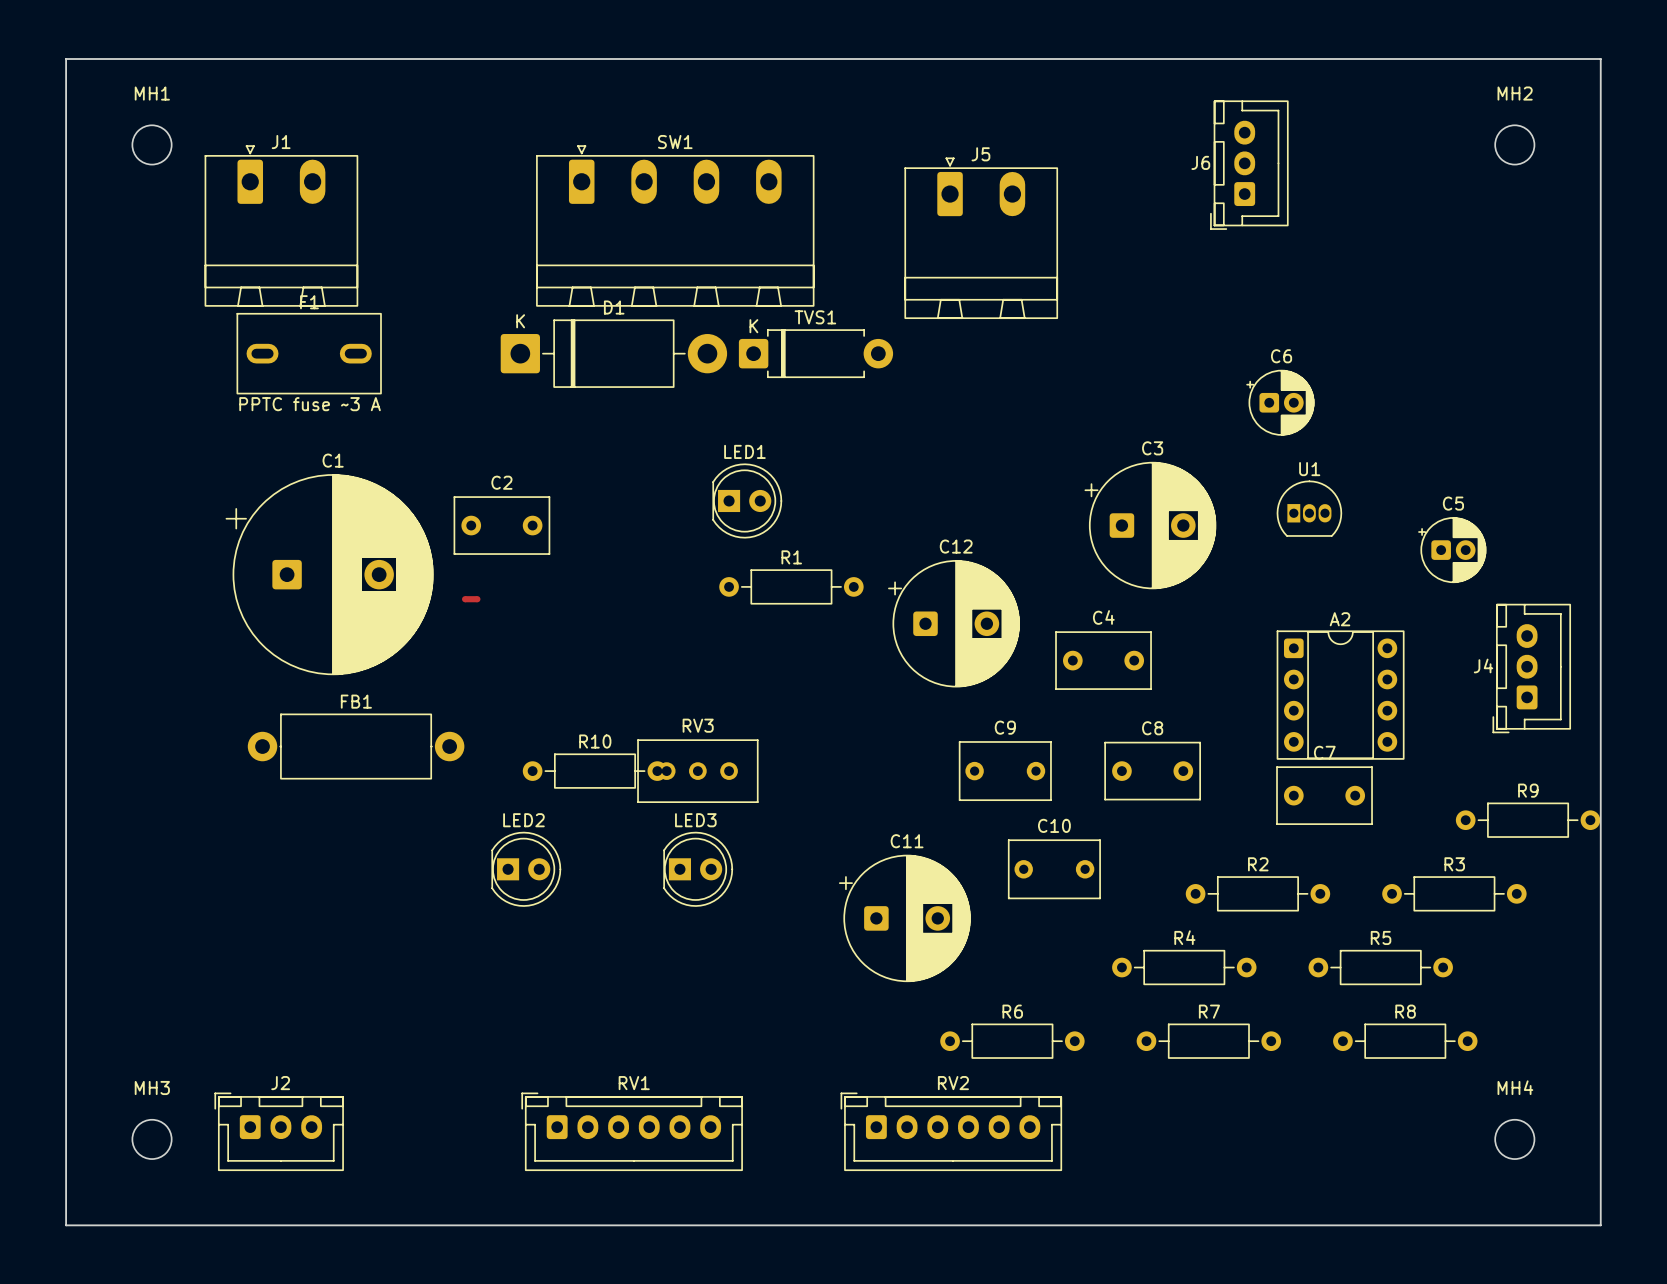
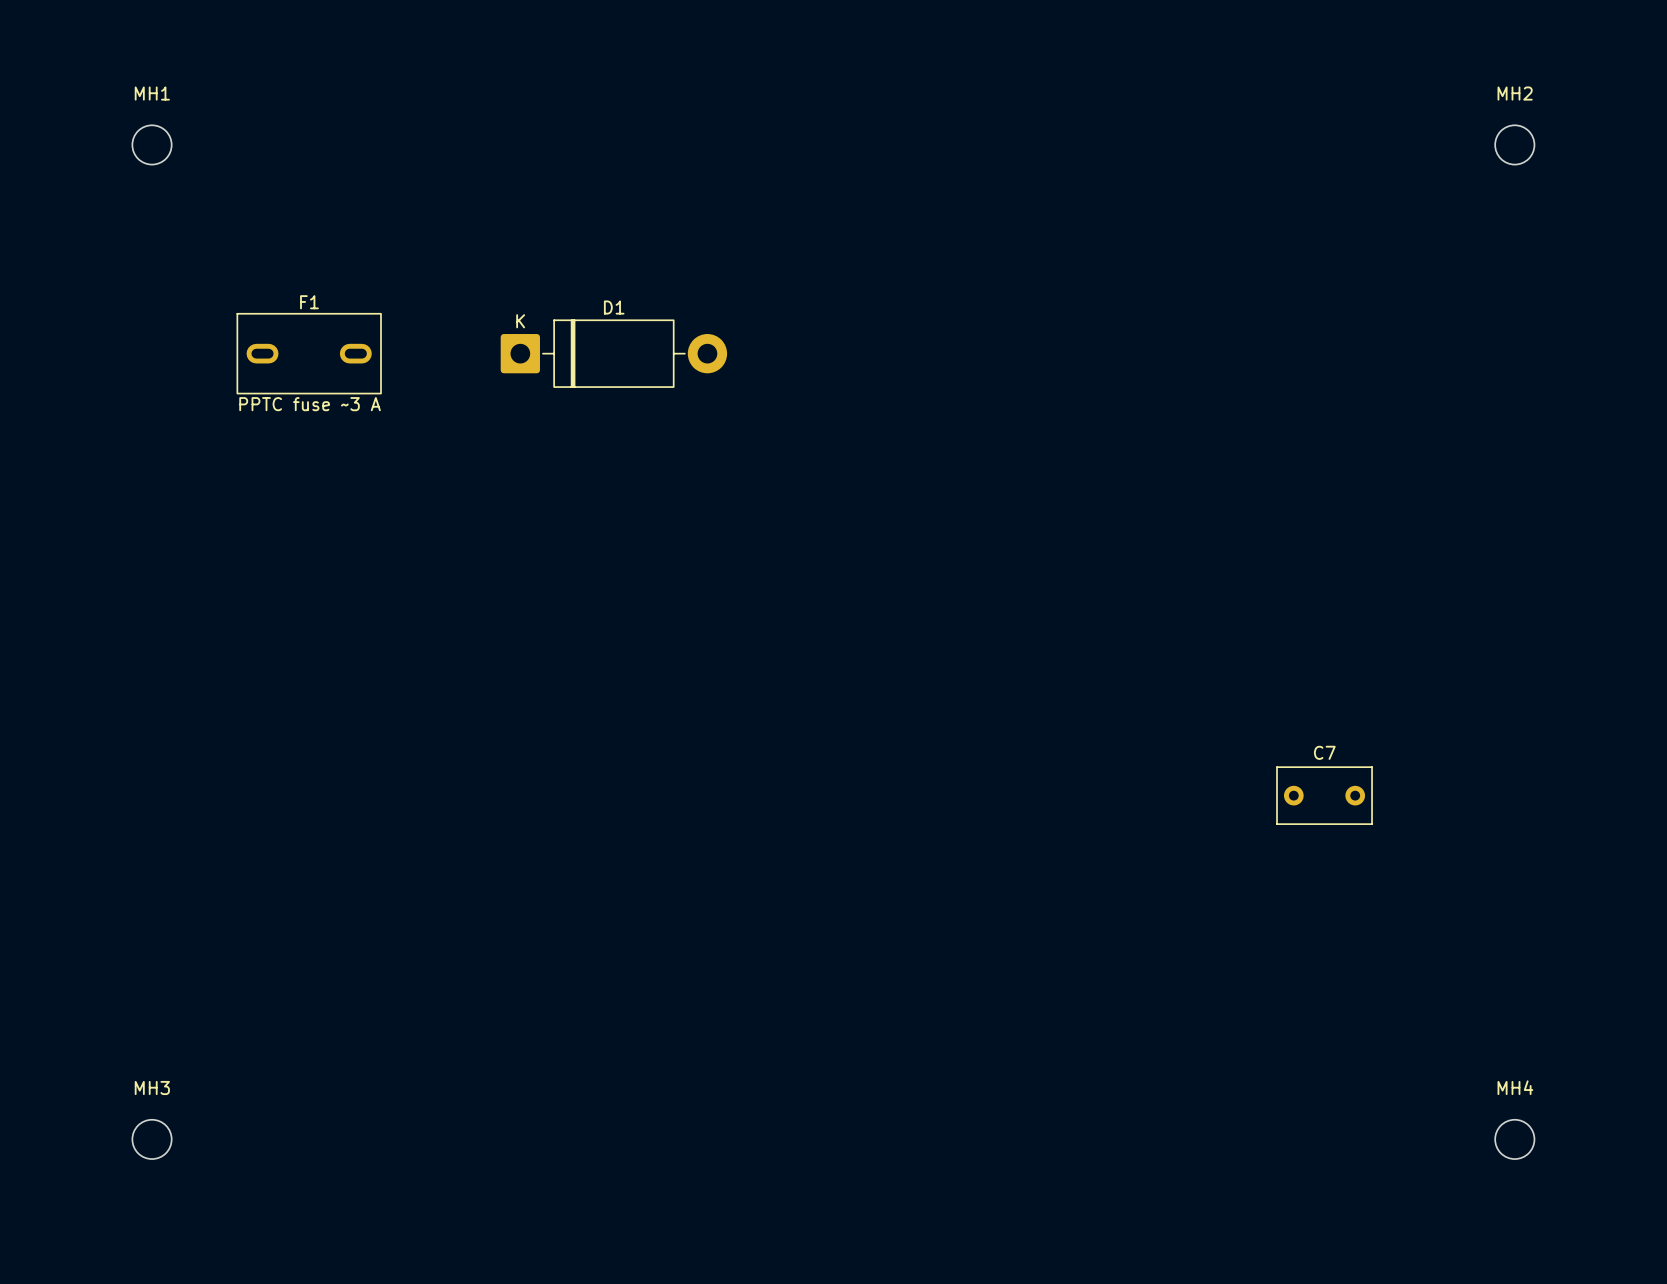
board edge: (66, 59) (1600, 59) (1600, 1225) (66, 1225) (66, 59) -> none
J6: (1249, 165) -> none
J1: (281, 225) -> none
SW1: (675, 225) -> none
J5: (981, 238) -> none
TVS1: (815, 353) -> none
C6: (1280, 402) -> none
LED1: (747, 500) -> none
U1: (1309, 508) -> none
C2: (501, 525) -> none
C3: (1150, 525) -> none
C5: (1452, 550) -> none
C1: (329, 574) -> none
R1: (791, 586) -> none
part: (471, 599) -> none
C12: (953, 623) -> none
C4: (1103, 660) -> none
J4: (1531, 668) -> none
A2: (1340, 695) -> none
FB1: (356, 746) -> none
R10: (594, 771) -> none
RV3: (697, 771) -> none
C9: (1005, 771) -> none
C8: (1152, 771) -> none
R9: (1528, 820) -> none
LED2: (526, 869) -> none
LED3: (698, 869) -> none
C10: (1054, 869) -> none
R2: (1257, 893) -> none
R3: (1454, 893) -> none
C11: (904, 918) -> none
R4: (1184, 967) -> none
R5: (1380, 967) -> none
R6: (1012, 1041) -> none
R7: (1208, 1041) -> none
R8: (1405, 1041) -> none
J2: (279, 1131) -> none
RV1: (632, 1131) -> none
RV2: (951, 1131) -> none

